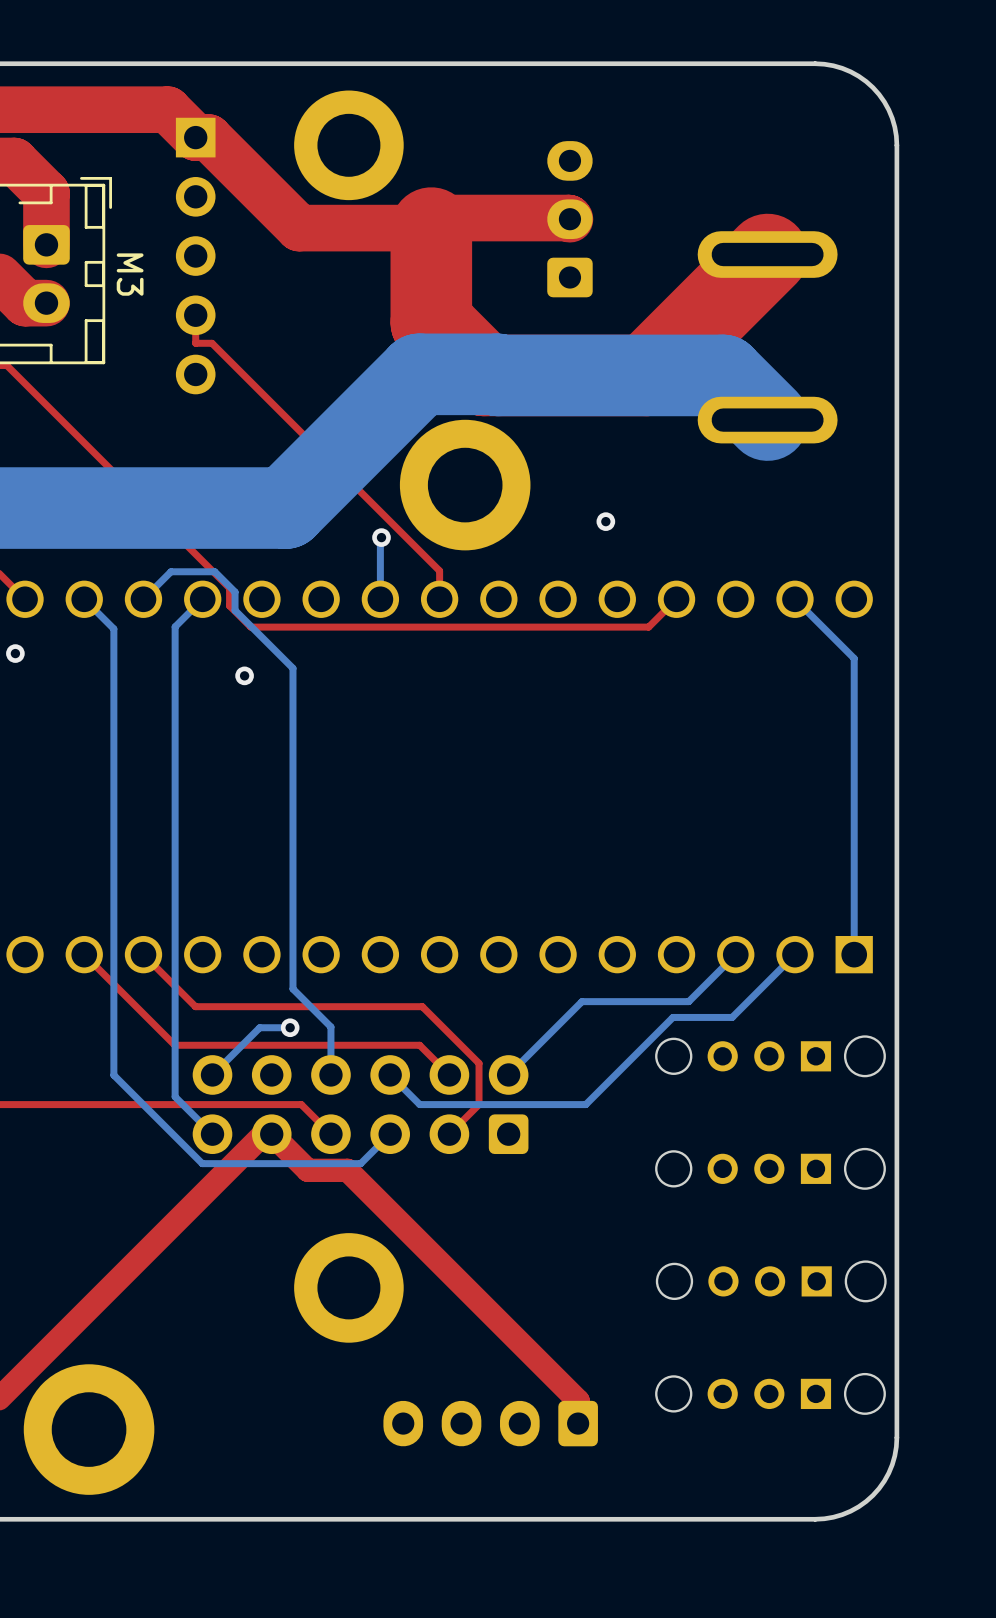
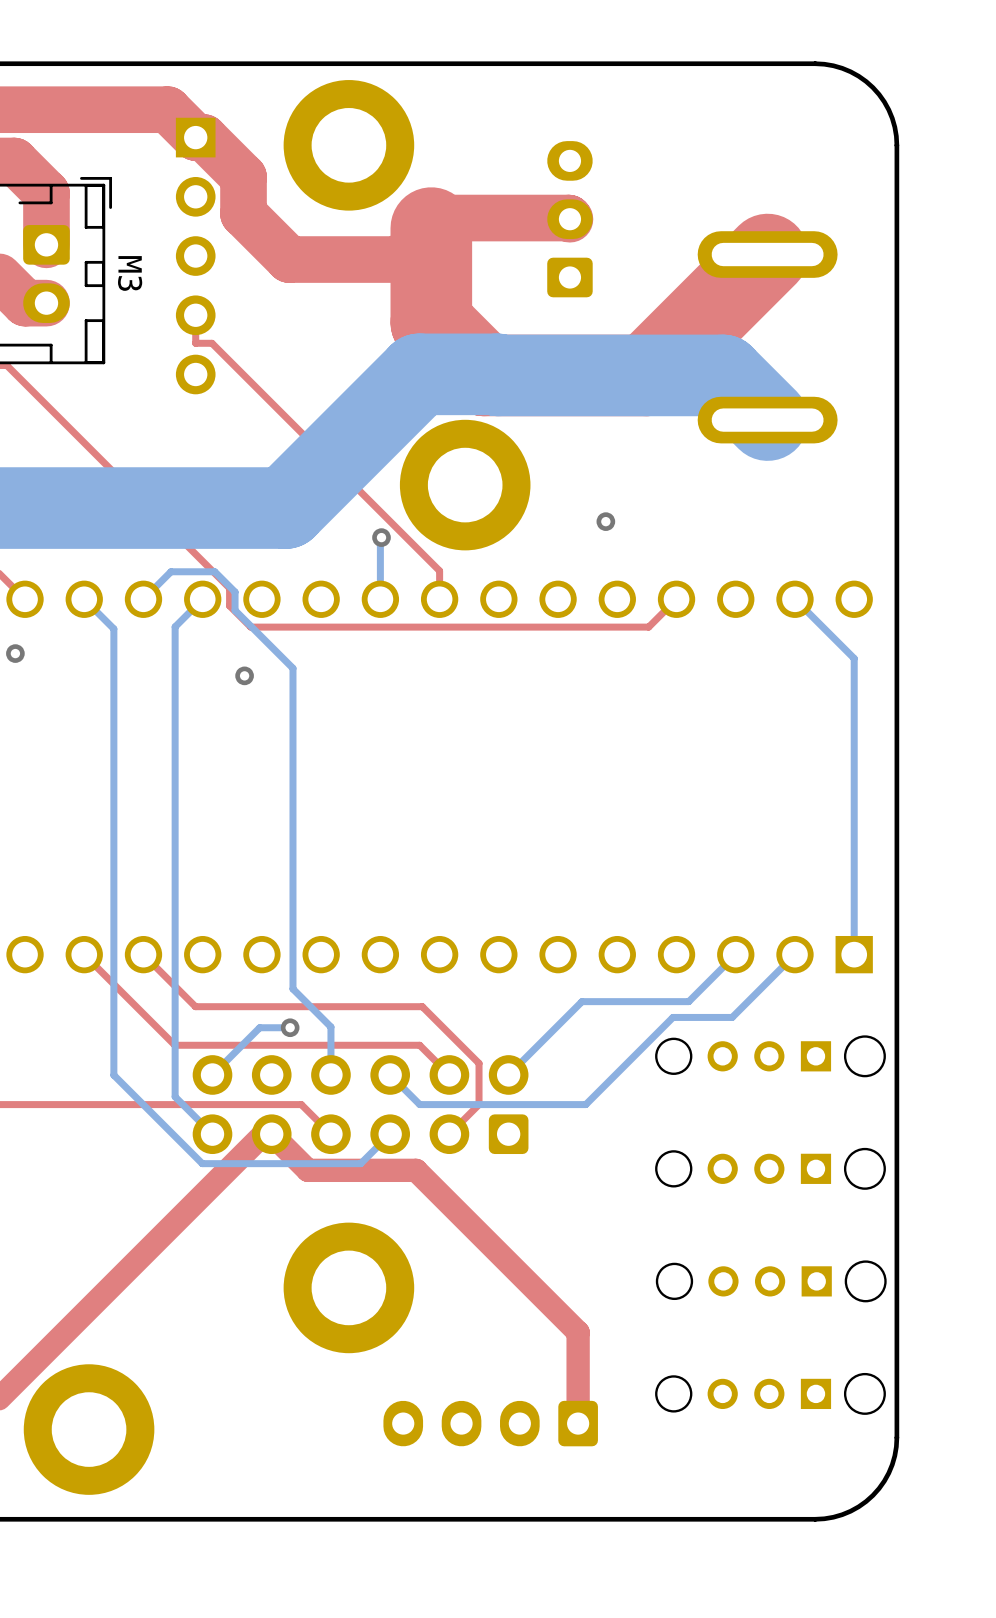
part footprint: [294, 90, 404, 201] -> [283, 80, 415, 211]
top track: (204, 137) (208, 137) (299, 228) (431, 228) -> (204, 137) (243, 177) (243, 213) (289, 259) (399, 259) (431, 228)
top track: (347, 1170) (578, 1400) -> (347, 1170) (416, 1170) (578, 1332) (578, 1400)
part footprint: [294, 1233, 404, 1343] -> [283, 1222, 415, 1354]

